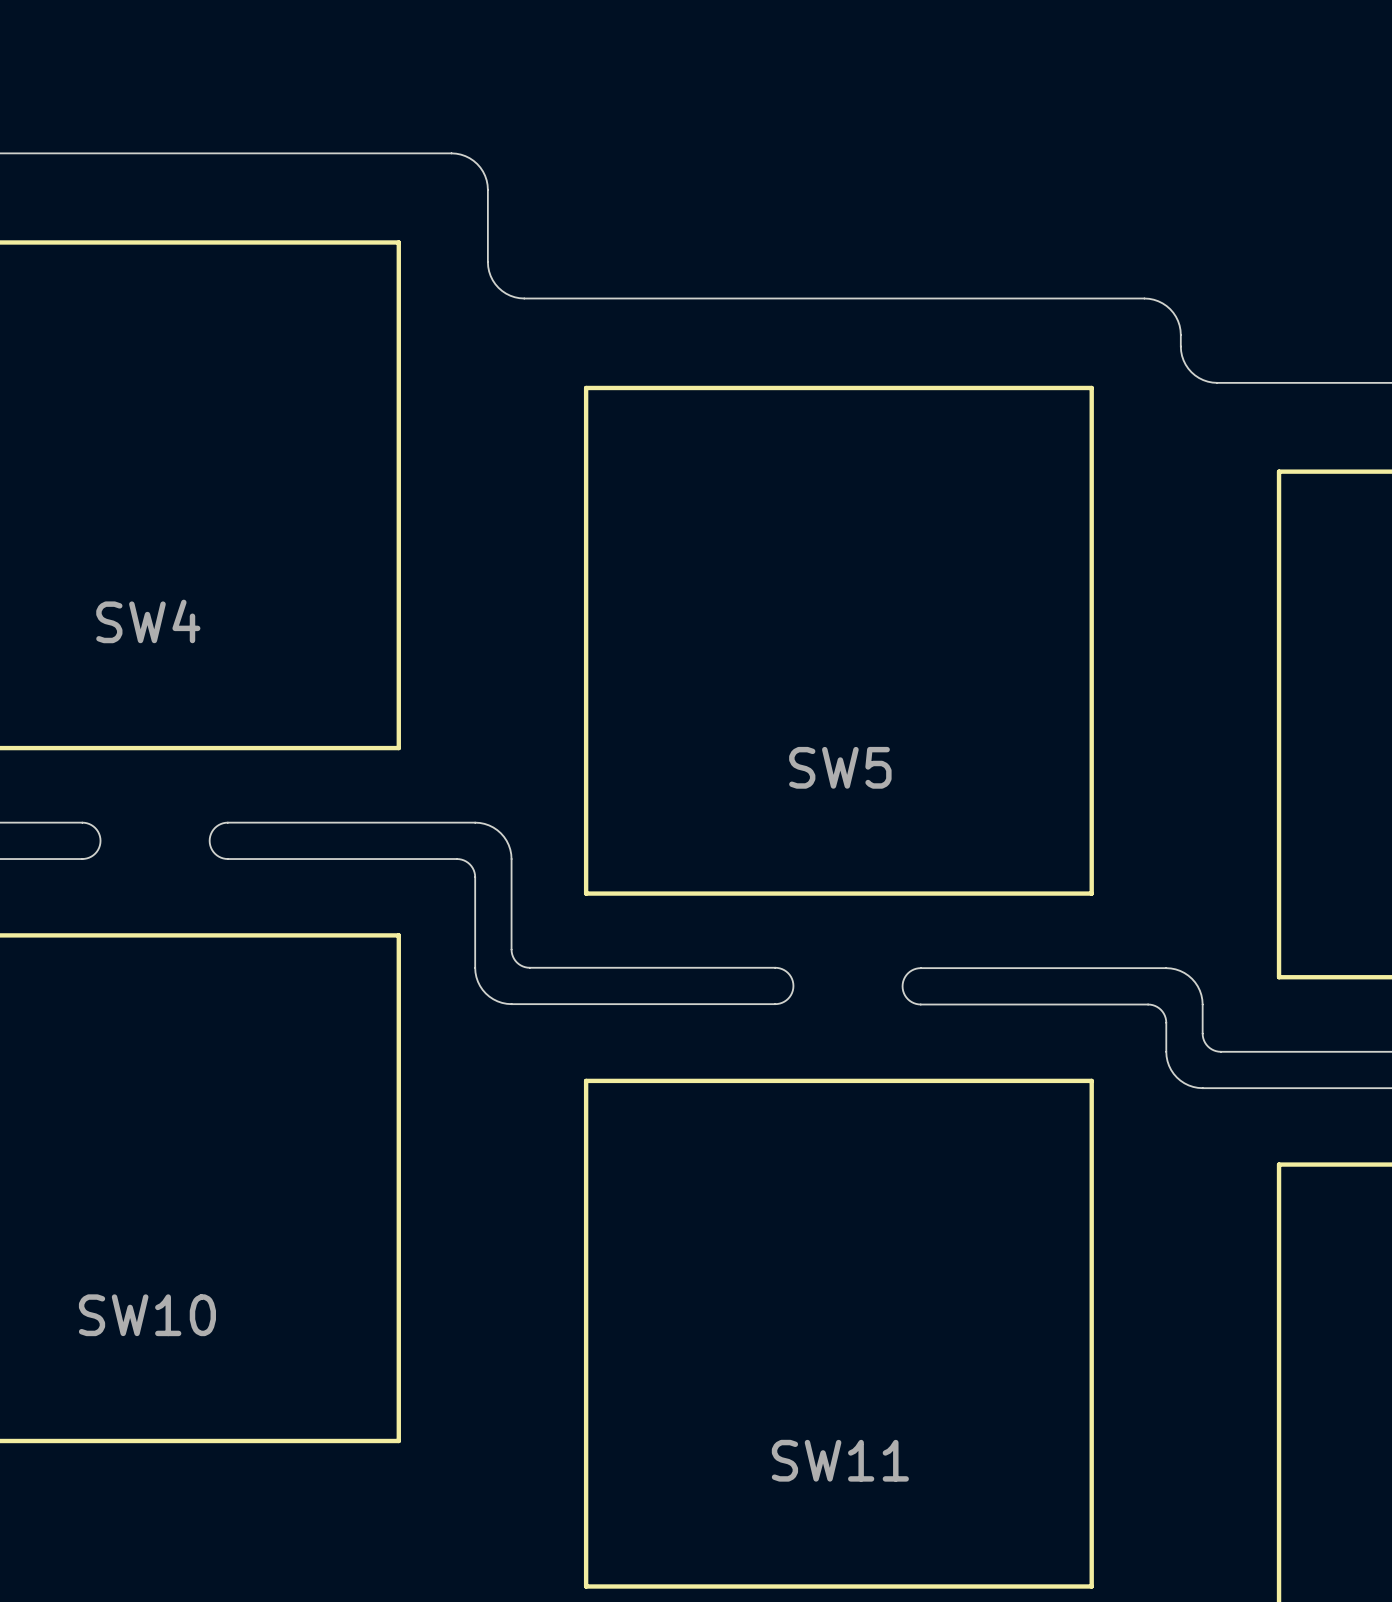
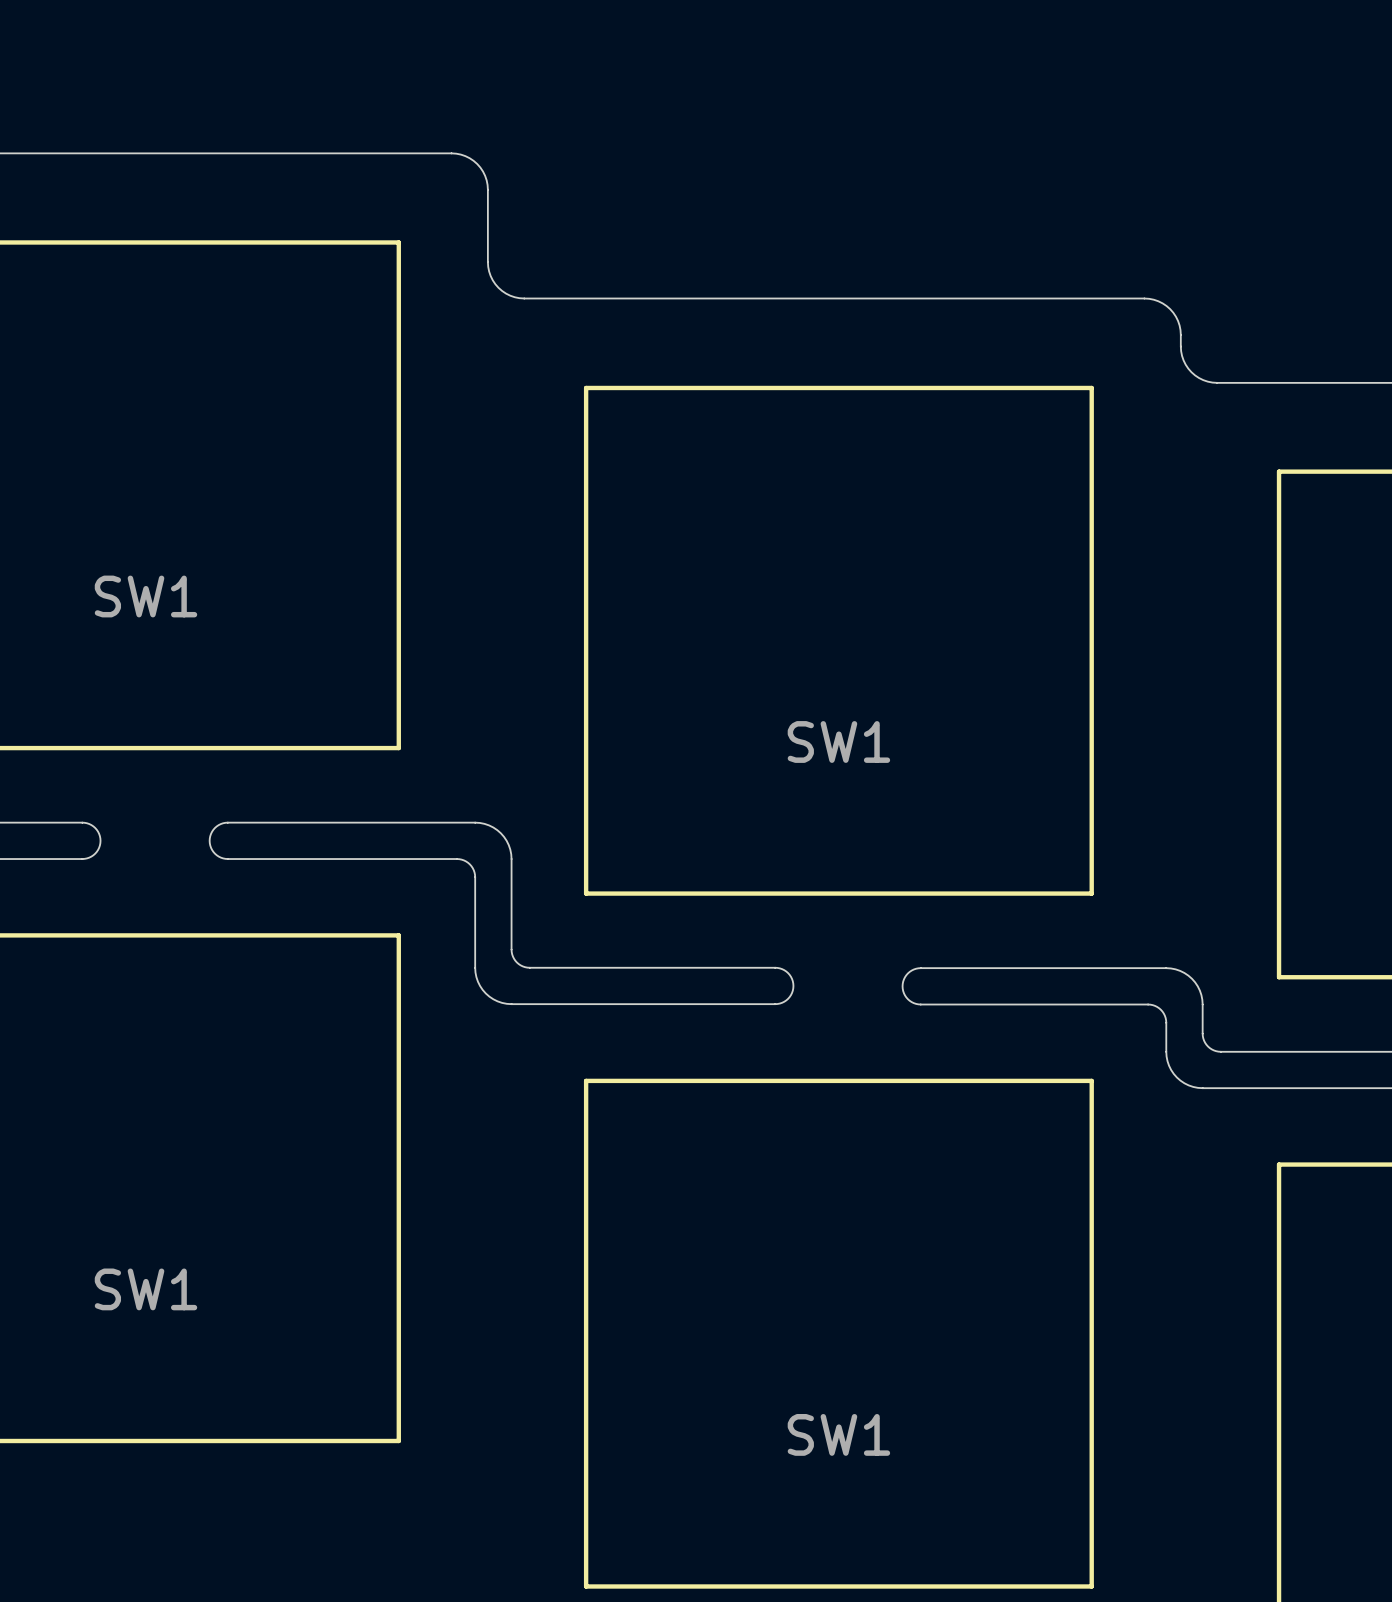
SW4 name: SW4 (148, 621) -> SW1 (146, 596)
SW5 name: SW5 (840, 767) -> SW1 (838, 741)
SW10 name: SW10 (147, 1315) -> SW1 (146, 1289)
SW11 name: SW11 (840, 1460) -> SW1 (838, 1434)

